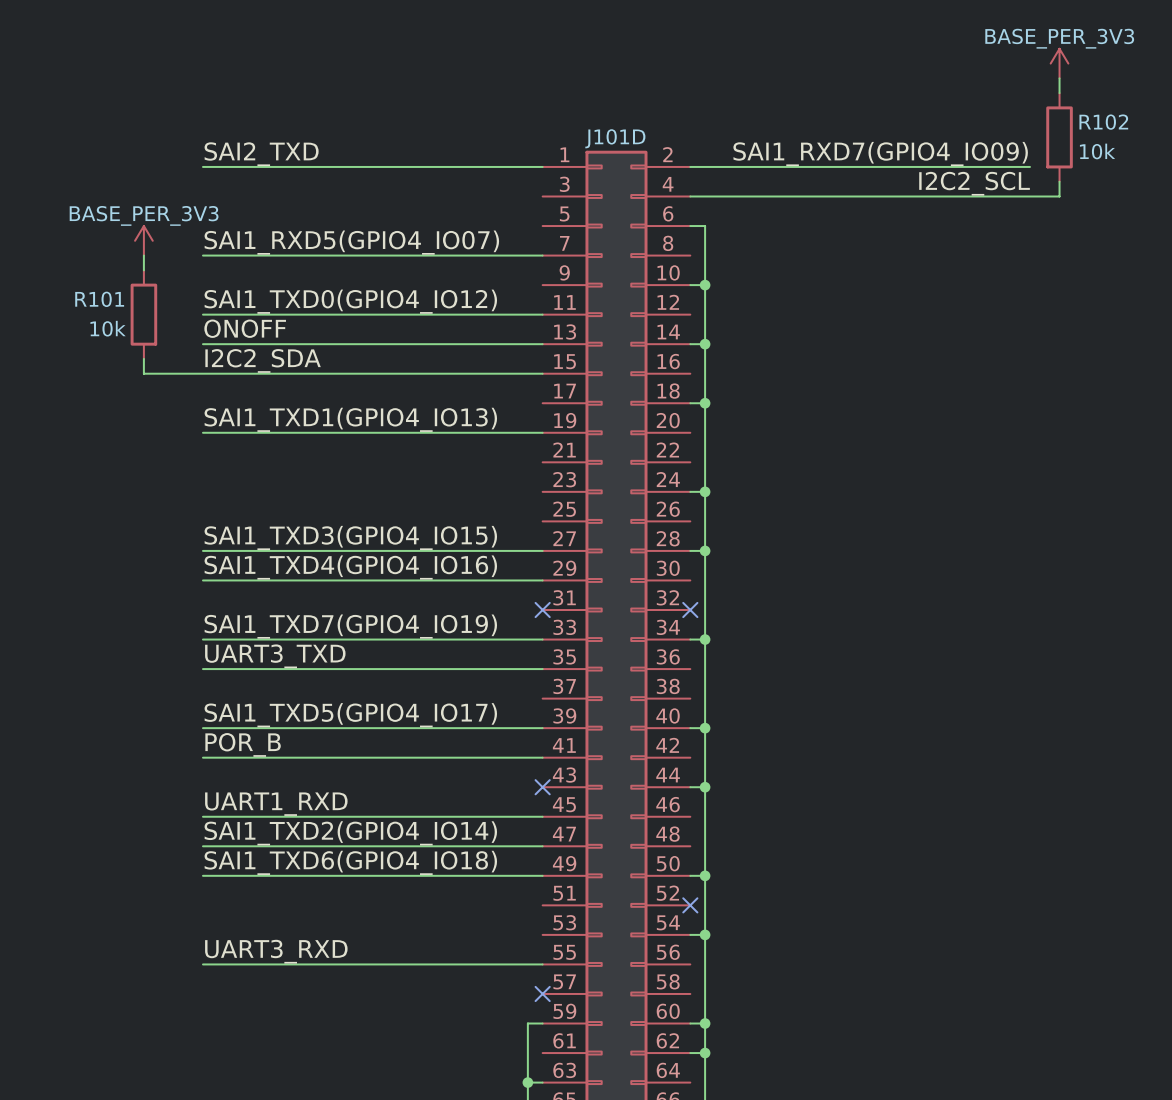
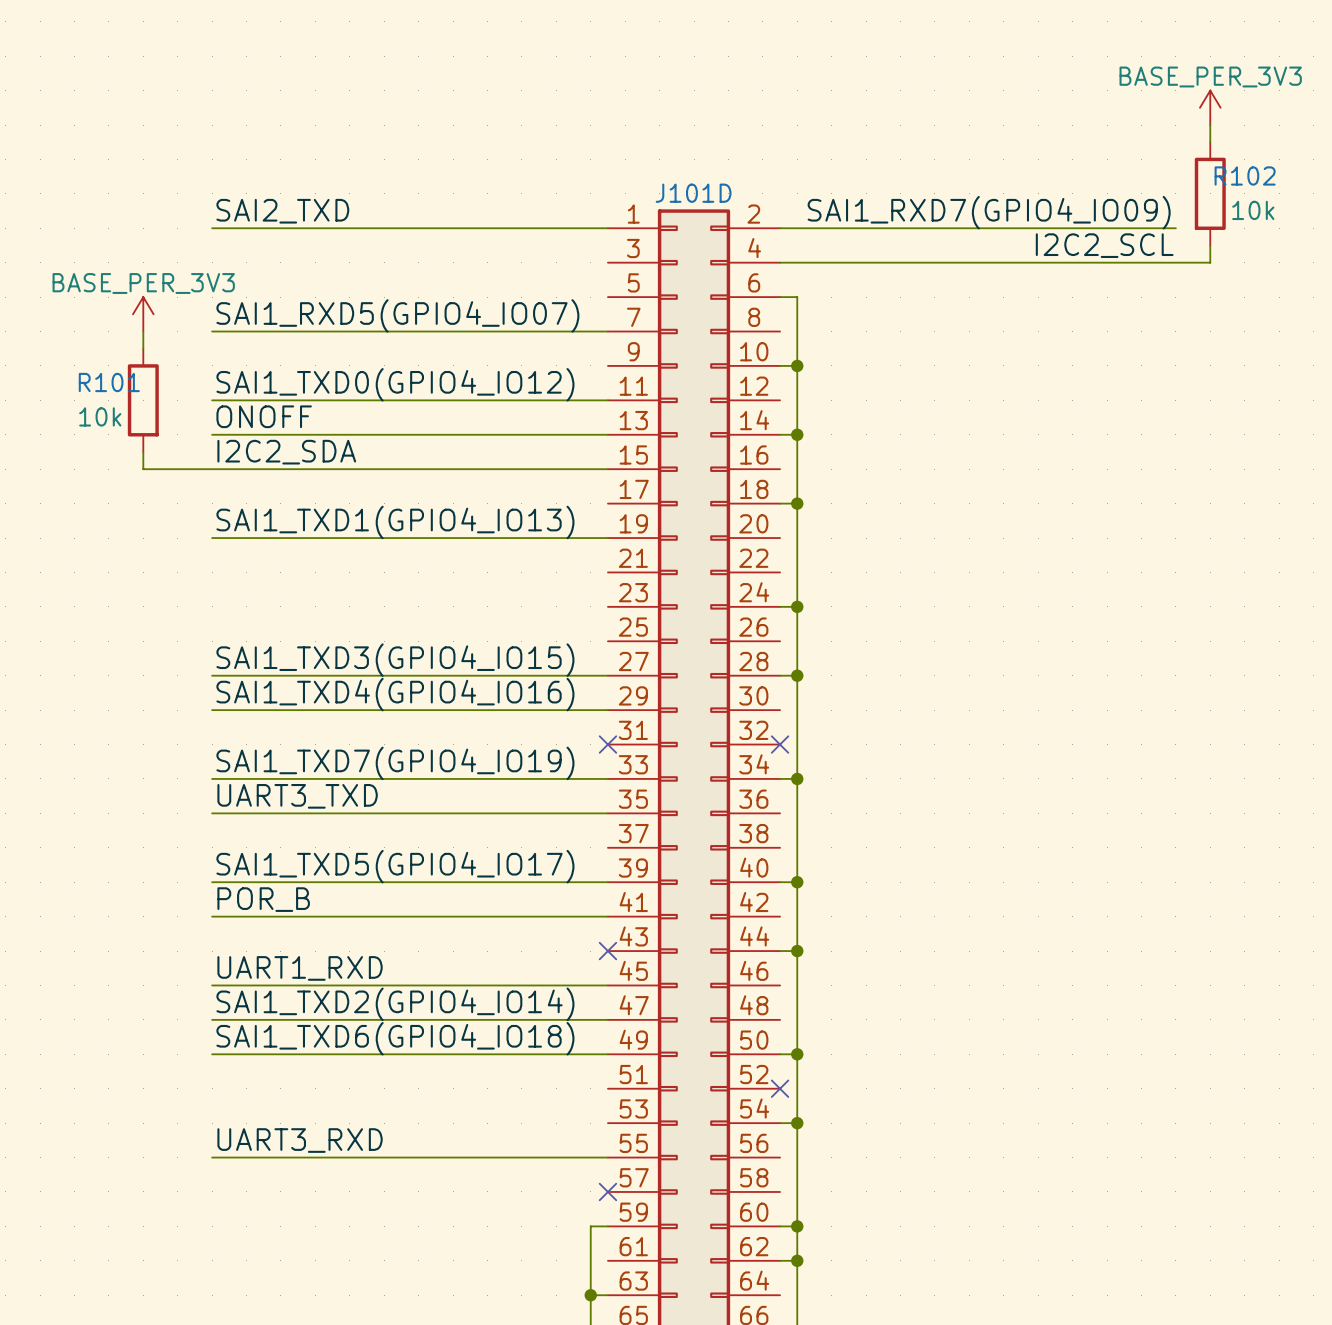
R102 name position: R102 (1103, 122) -> R102 (1245, 175)
R101 name position: R101 (99, 299) -> R101 (109, 382)

